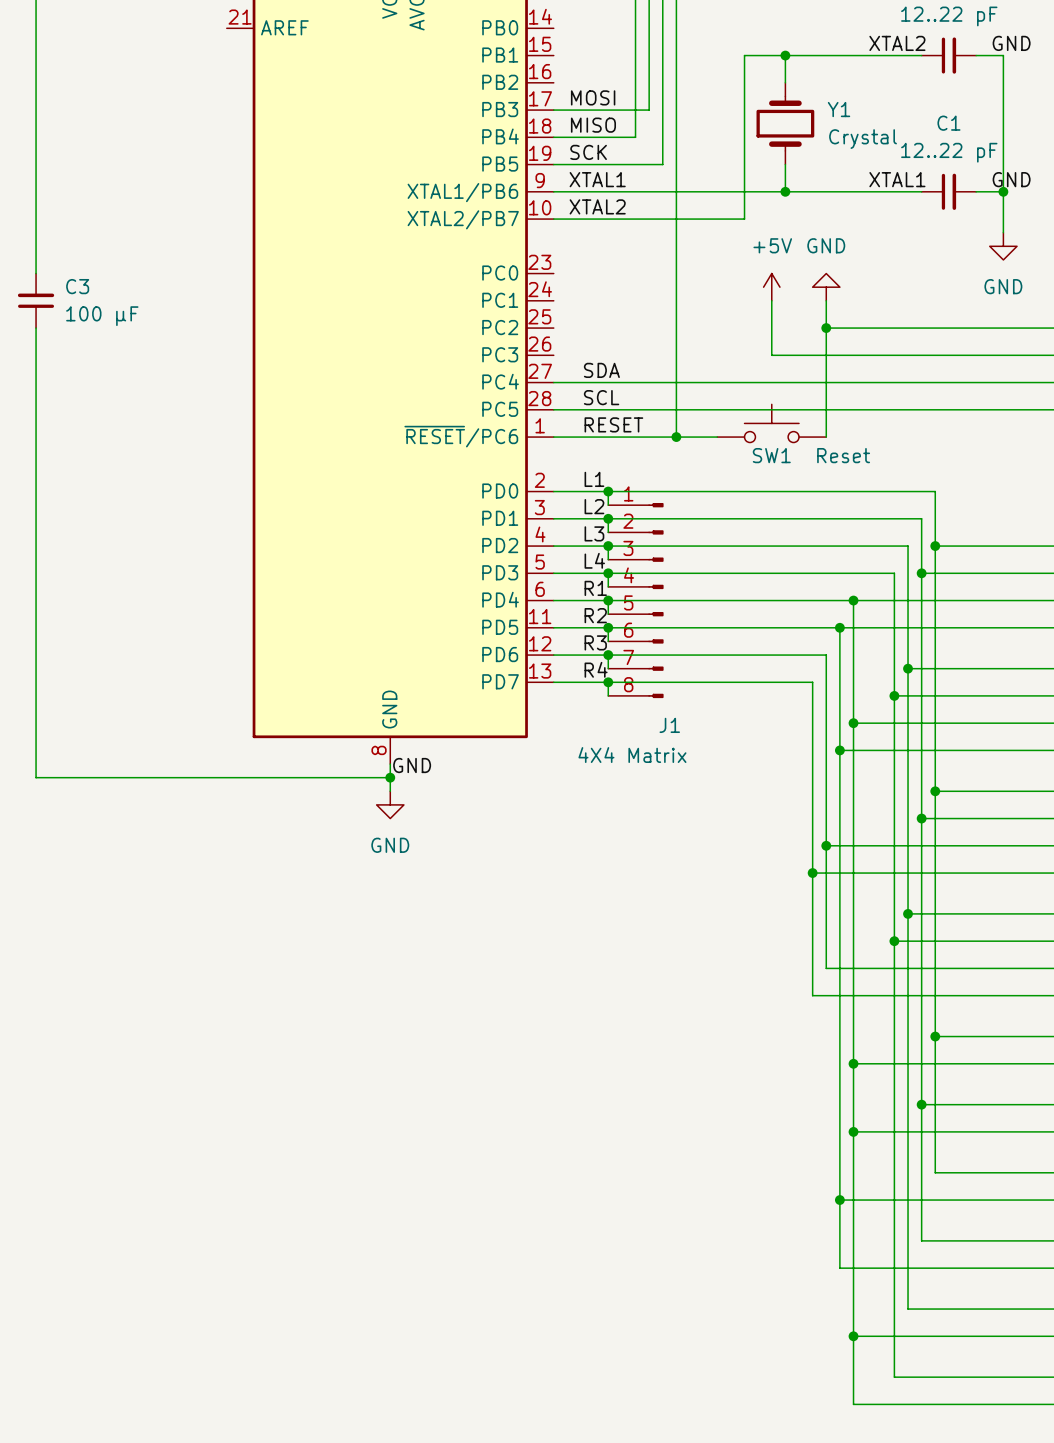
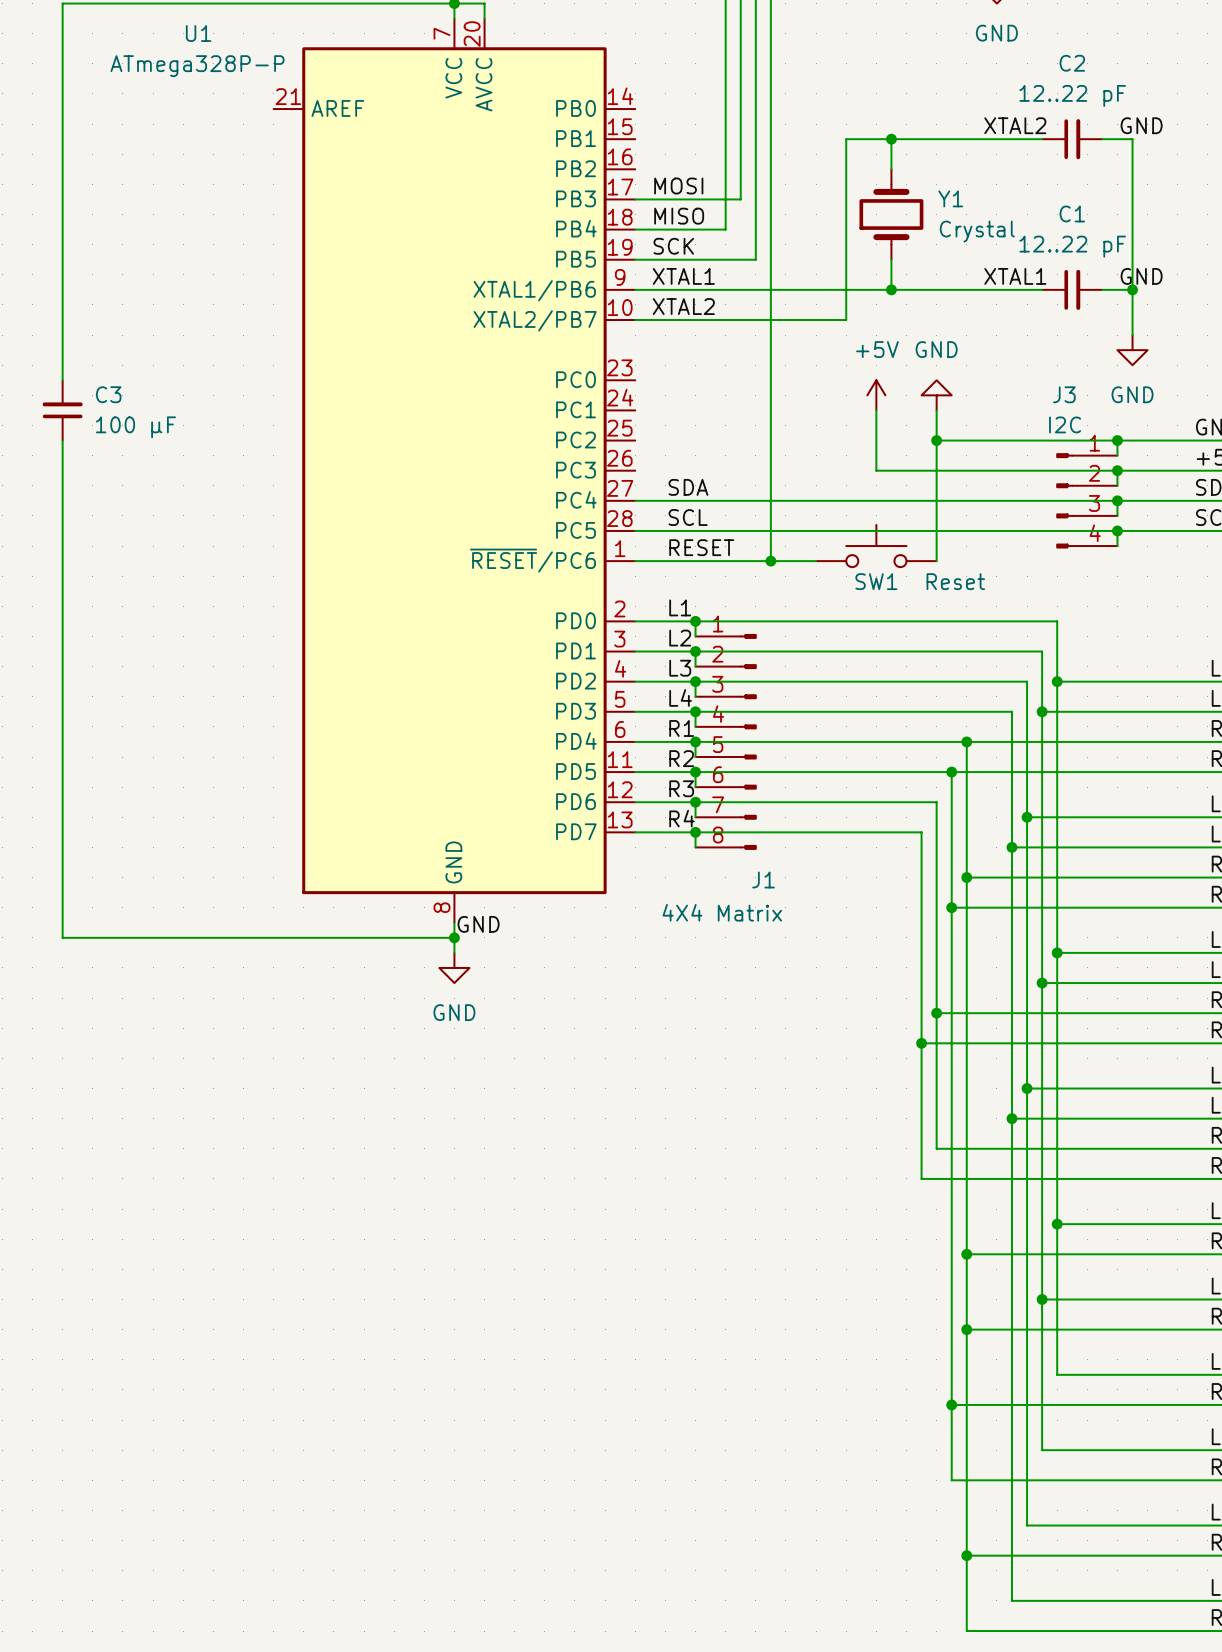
wire: none -> (1117, 440) (1117, 455)
junction: none -> (1117, 440)
wire: none -> (1117, 470) (1117, 485)
junction: none -> (1117, 470)
J3: none -> I2C (1086, 500)
wire: none -> (1117, 500) (1117, 515)
junction: none -> (1117, 500)
wire: none -> (1117, 530) (1117, 546)
junction: none -> (1117, 530)

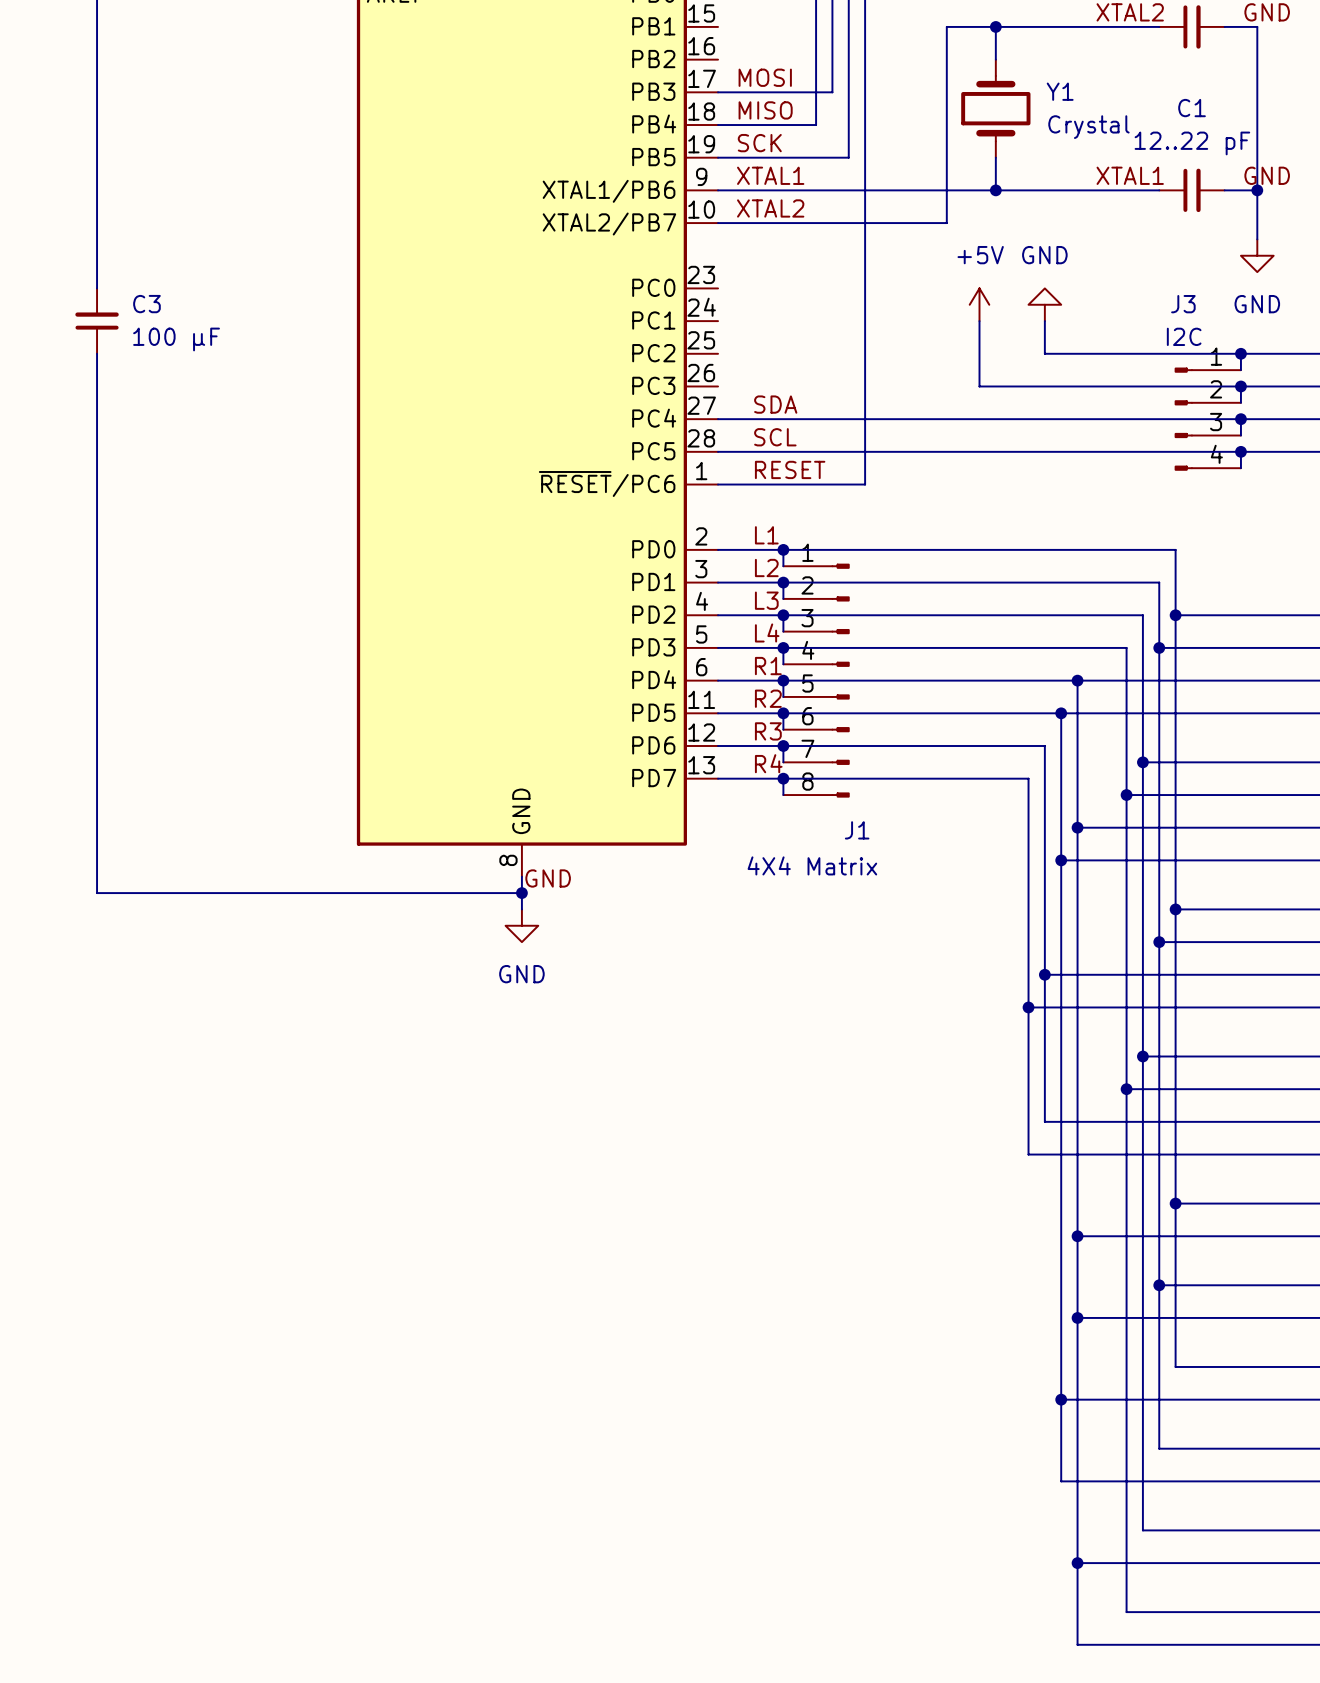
wire: (936, 440) (936, 561) -> none
junction: (936, 440) -> none
SW1: Reset (876, 546) -> none
wire: (770, 561) (816, 561) -> none
junction: (770, 561) -> none

